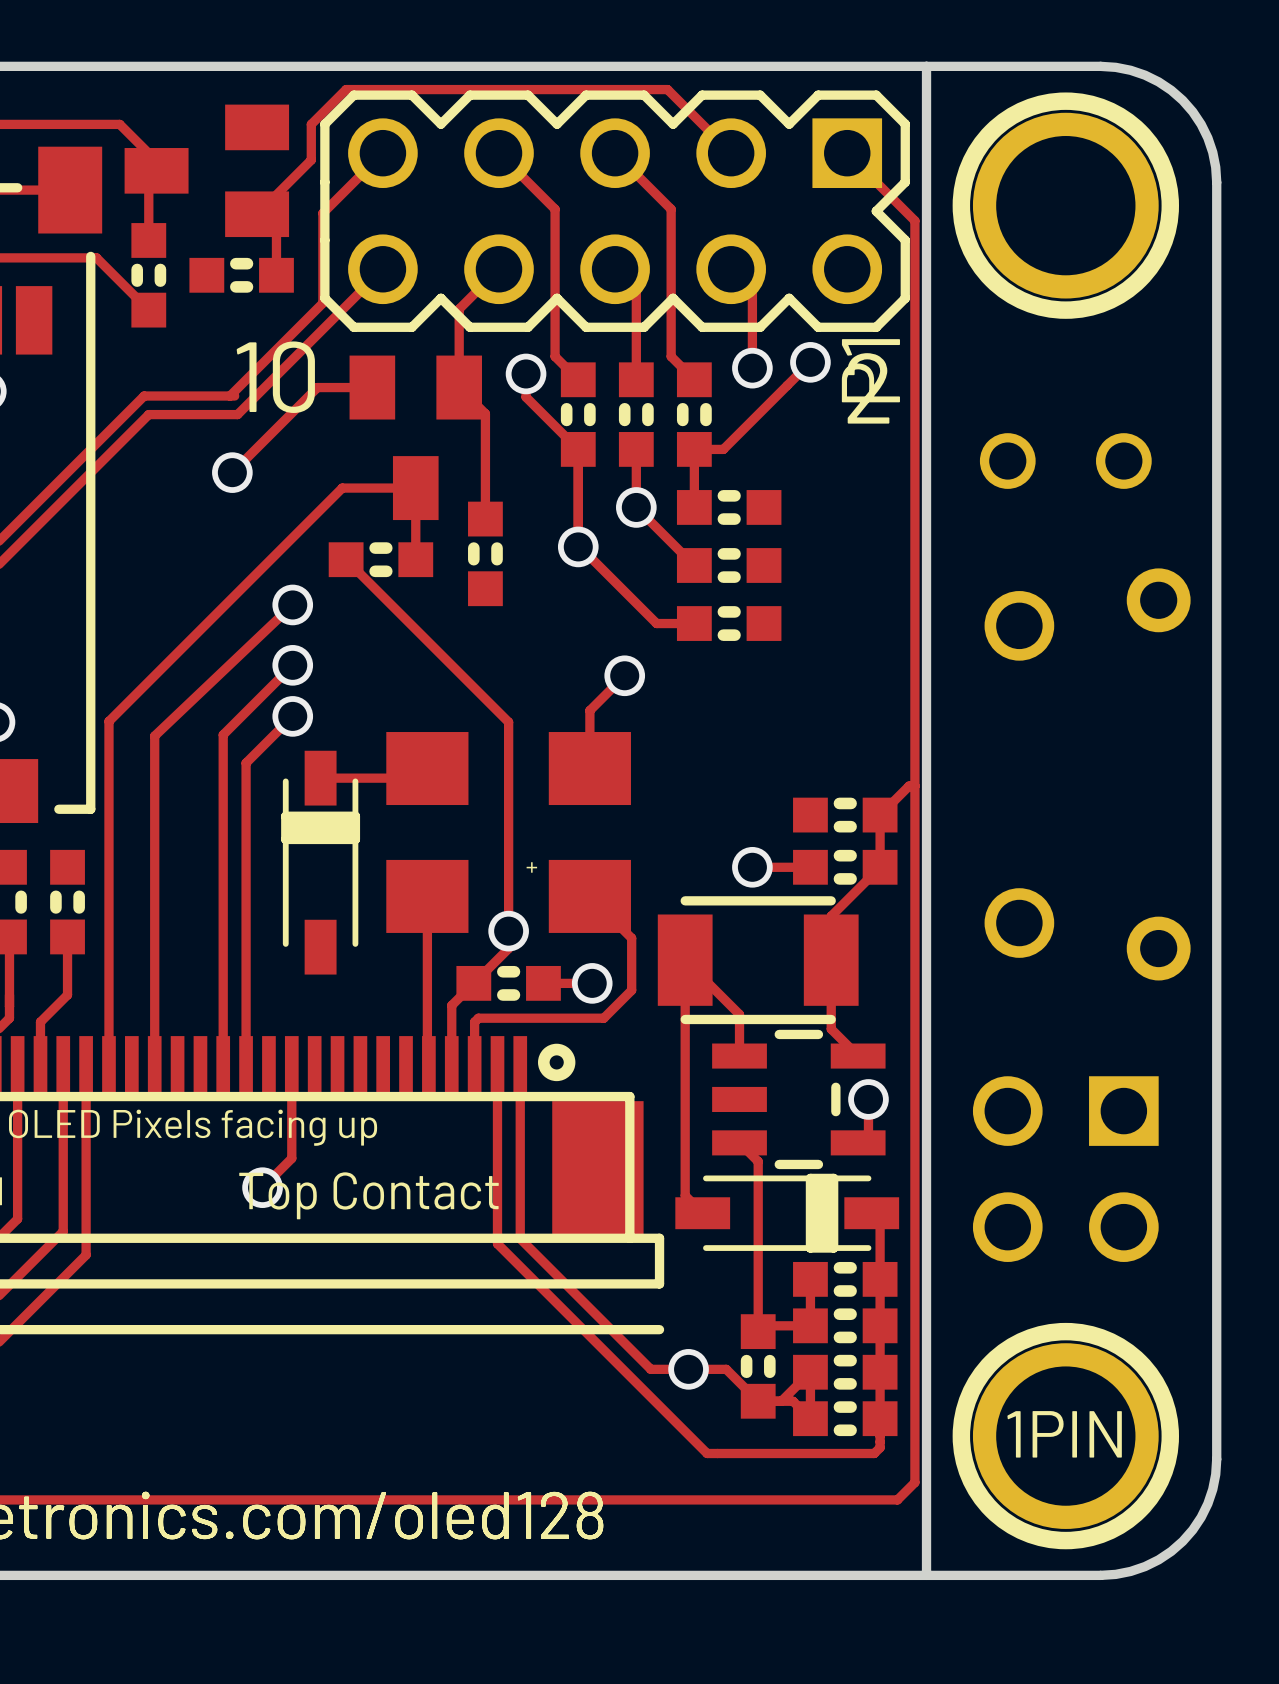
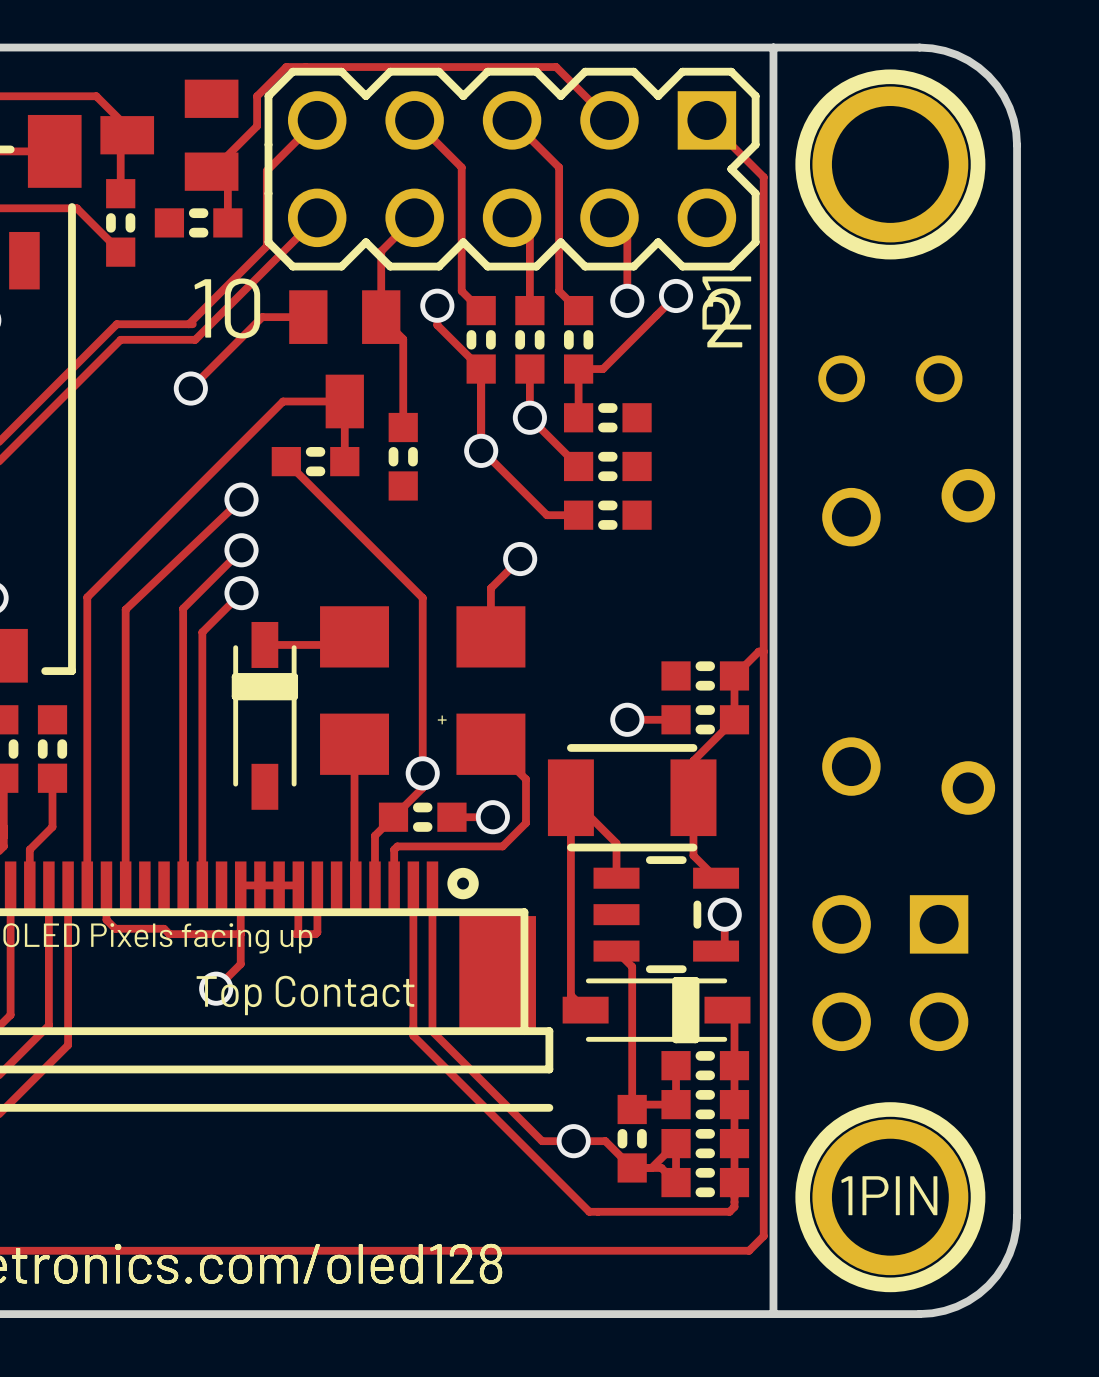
track: none -> (106, 885) (106, 919) (115, 928) (164, 928) (169, 934) (240, 934)
track: none -> (240, 885) (298, 885) (298, 931) (296, 934) (315, 934) (317, 932) (317, 885)

